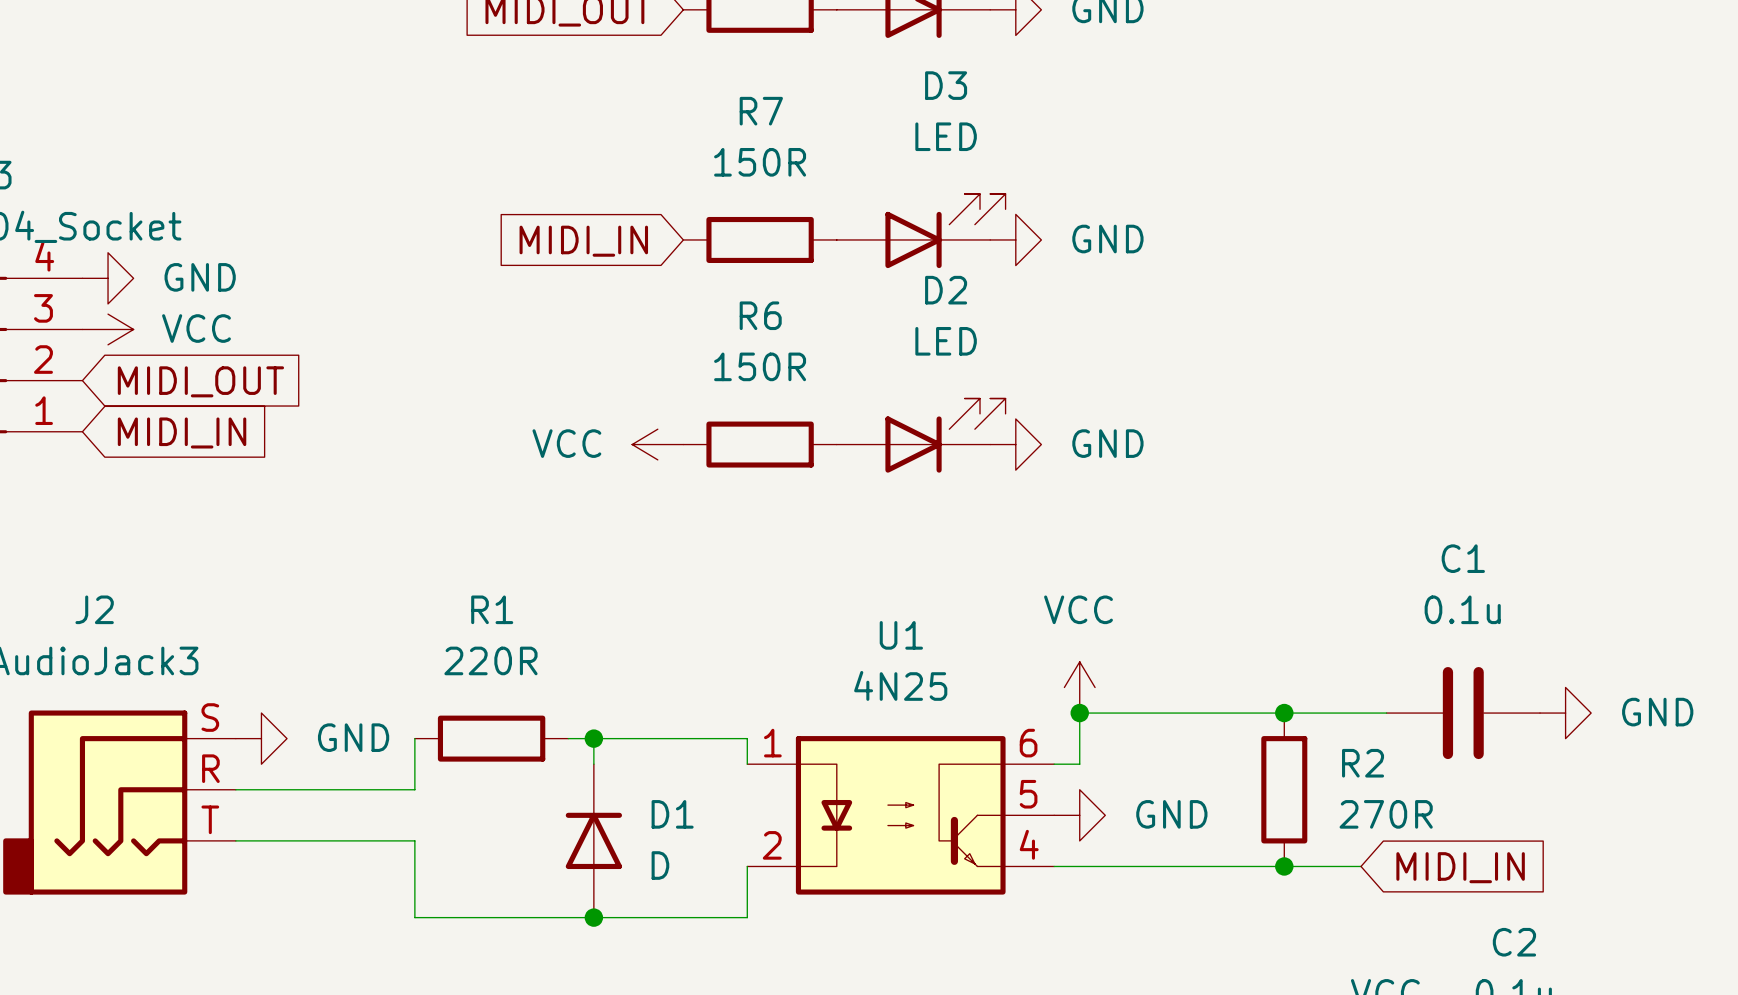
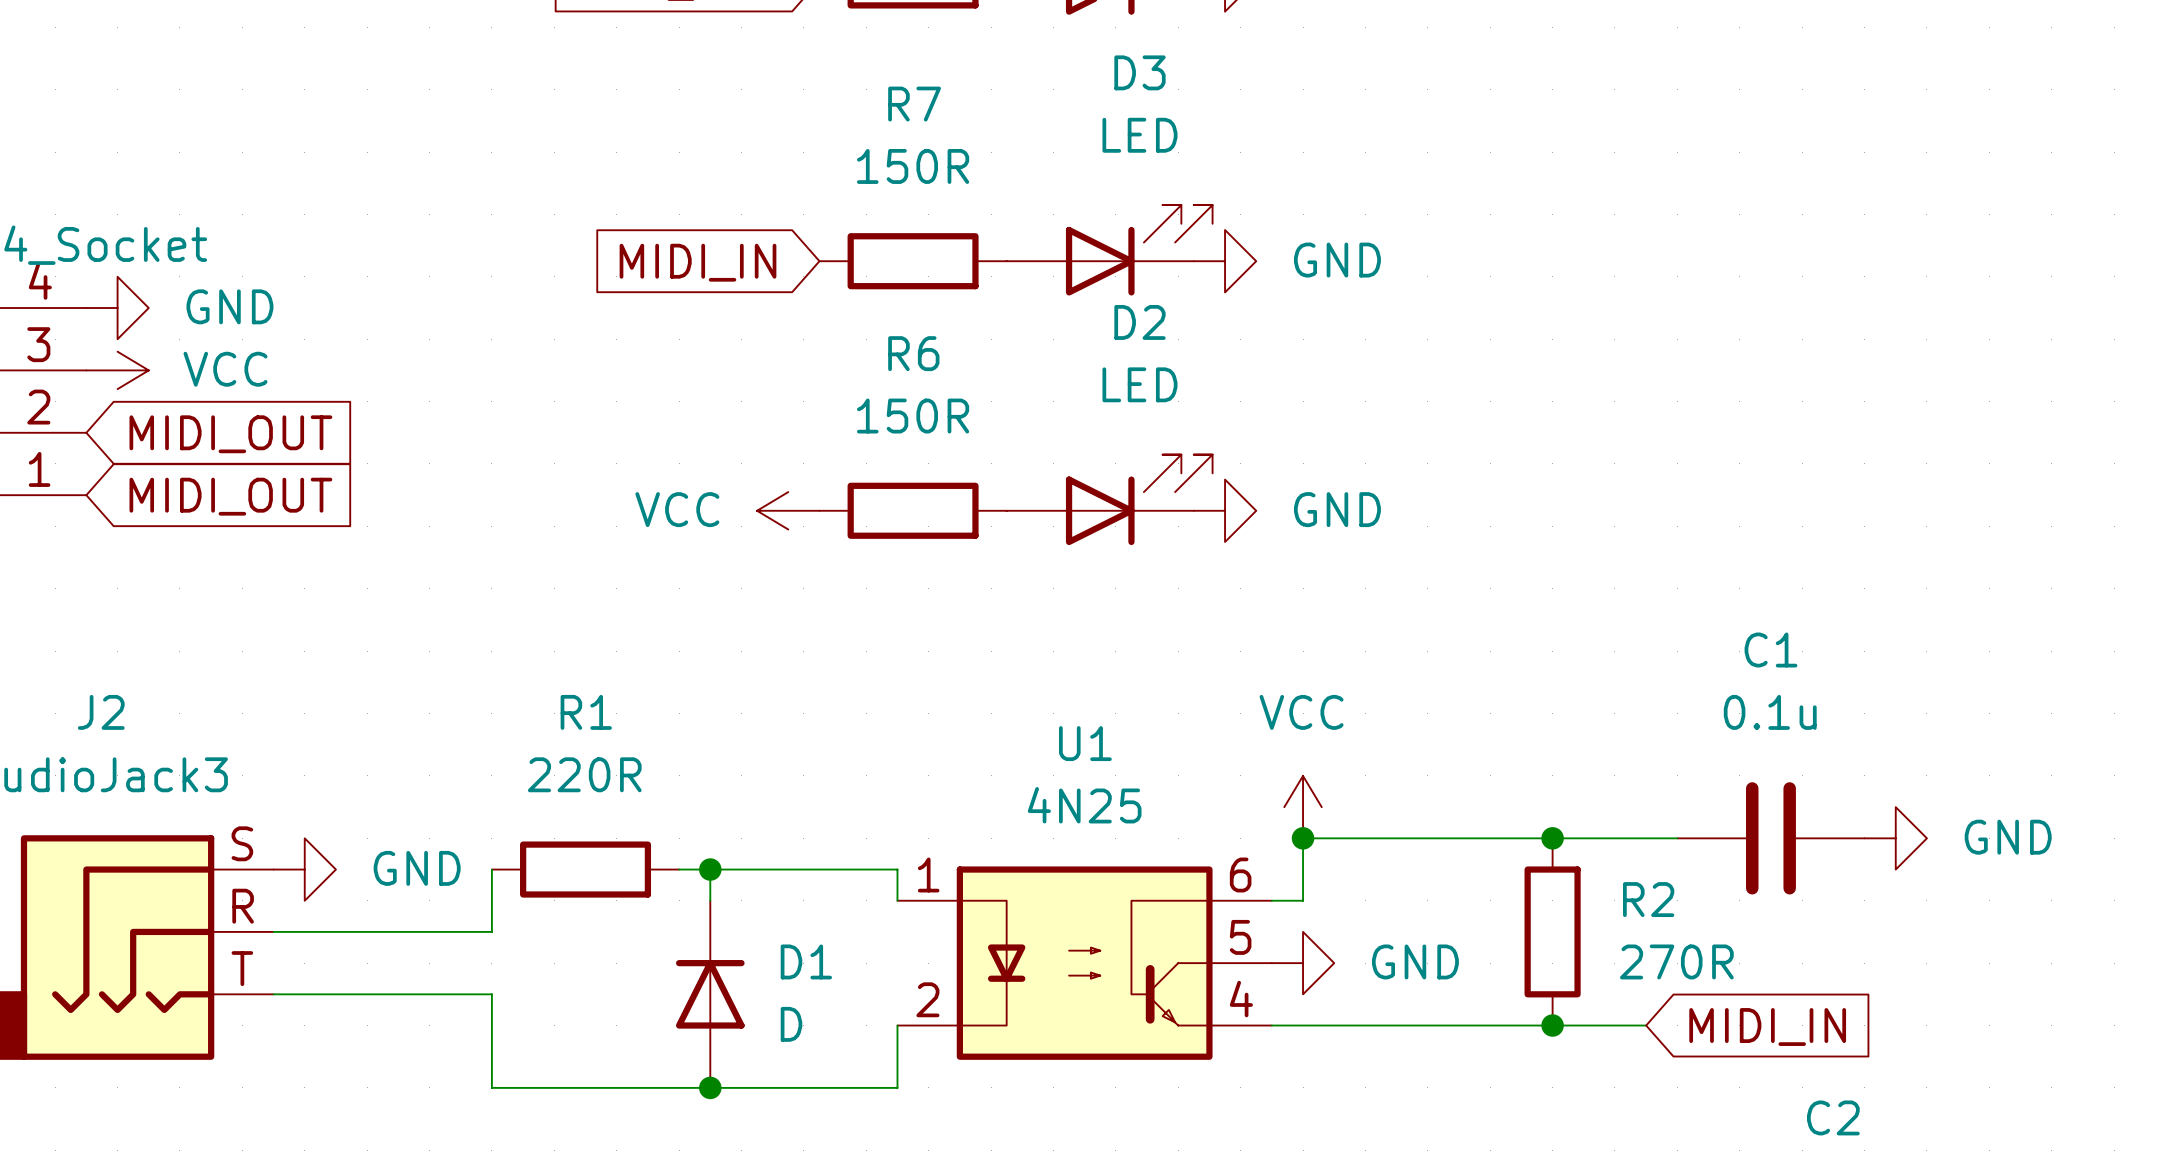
global label: MIDI_IN (182, 432) -> MIDI_OUT (230, 496)

